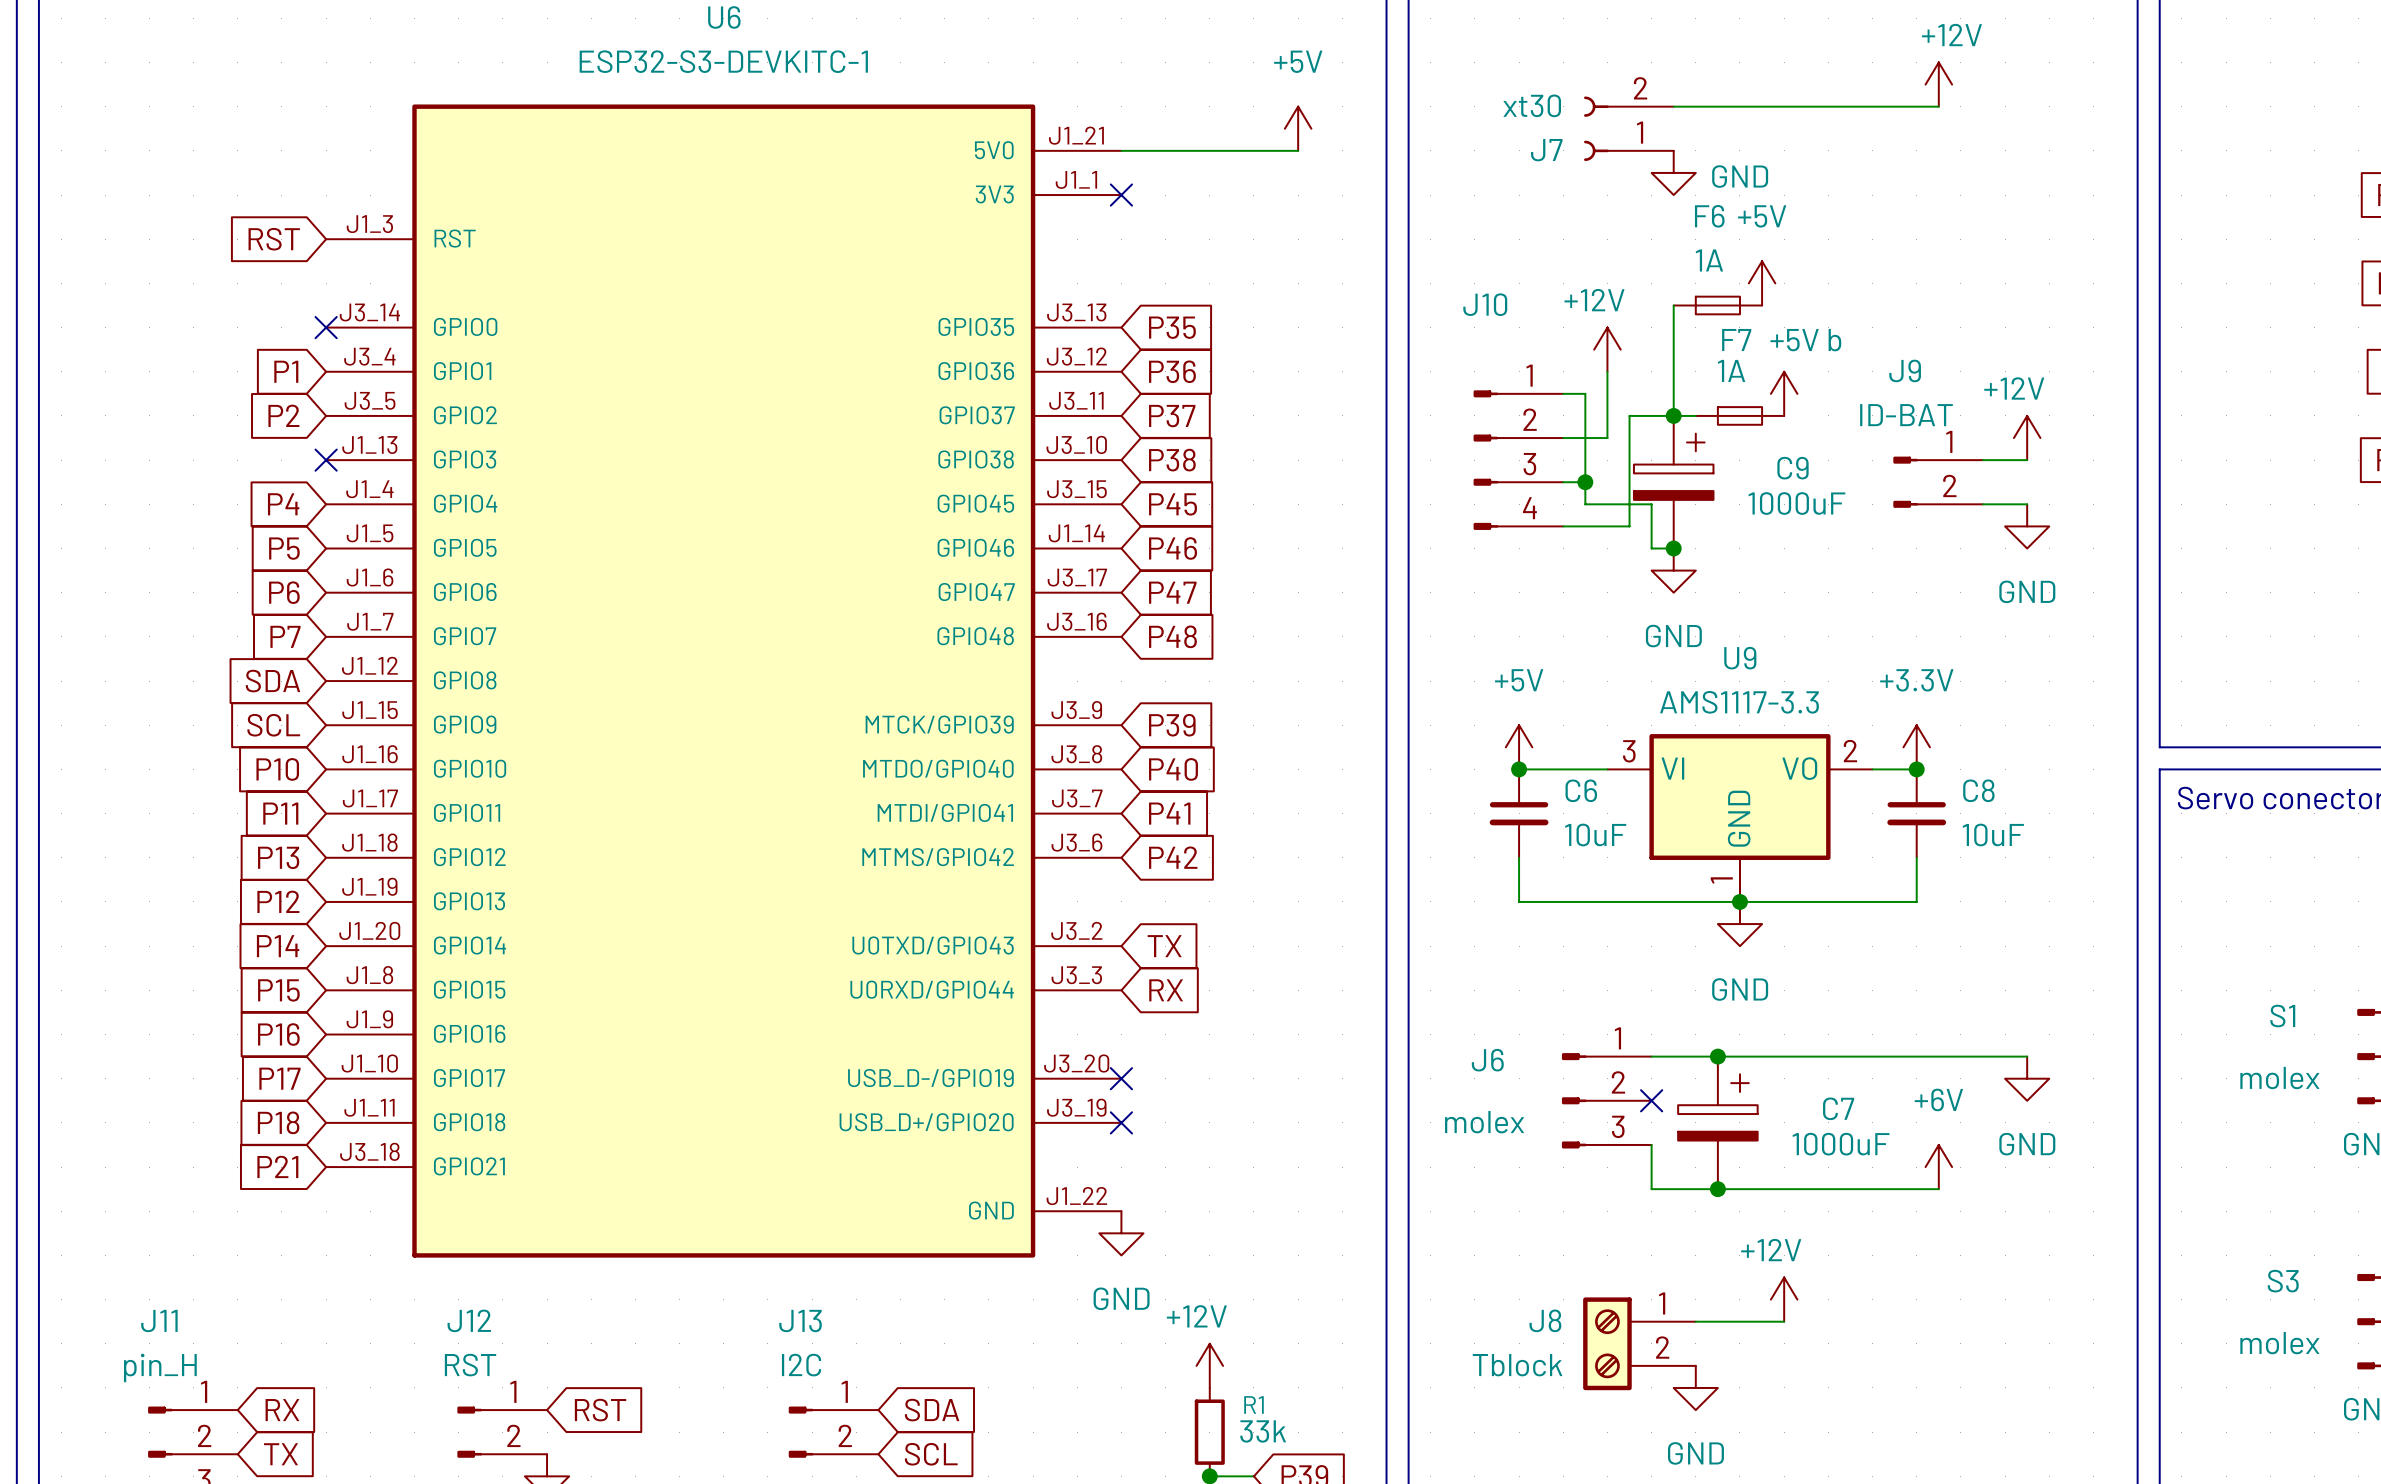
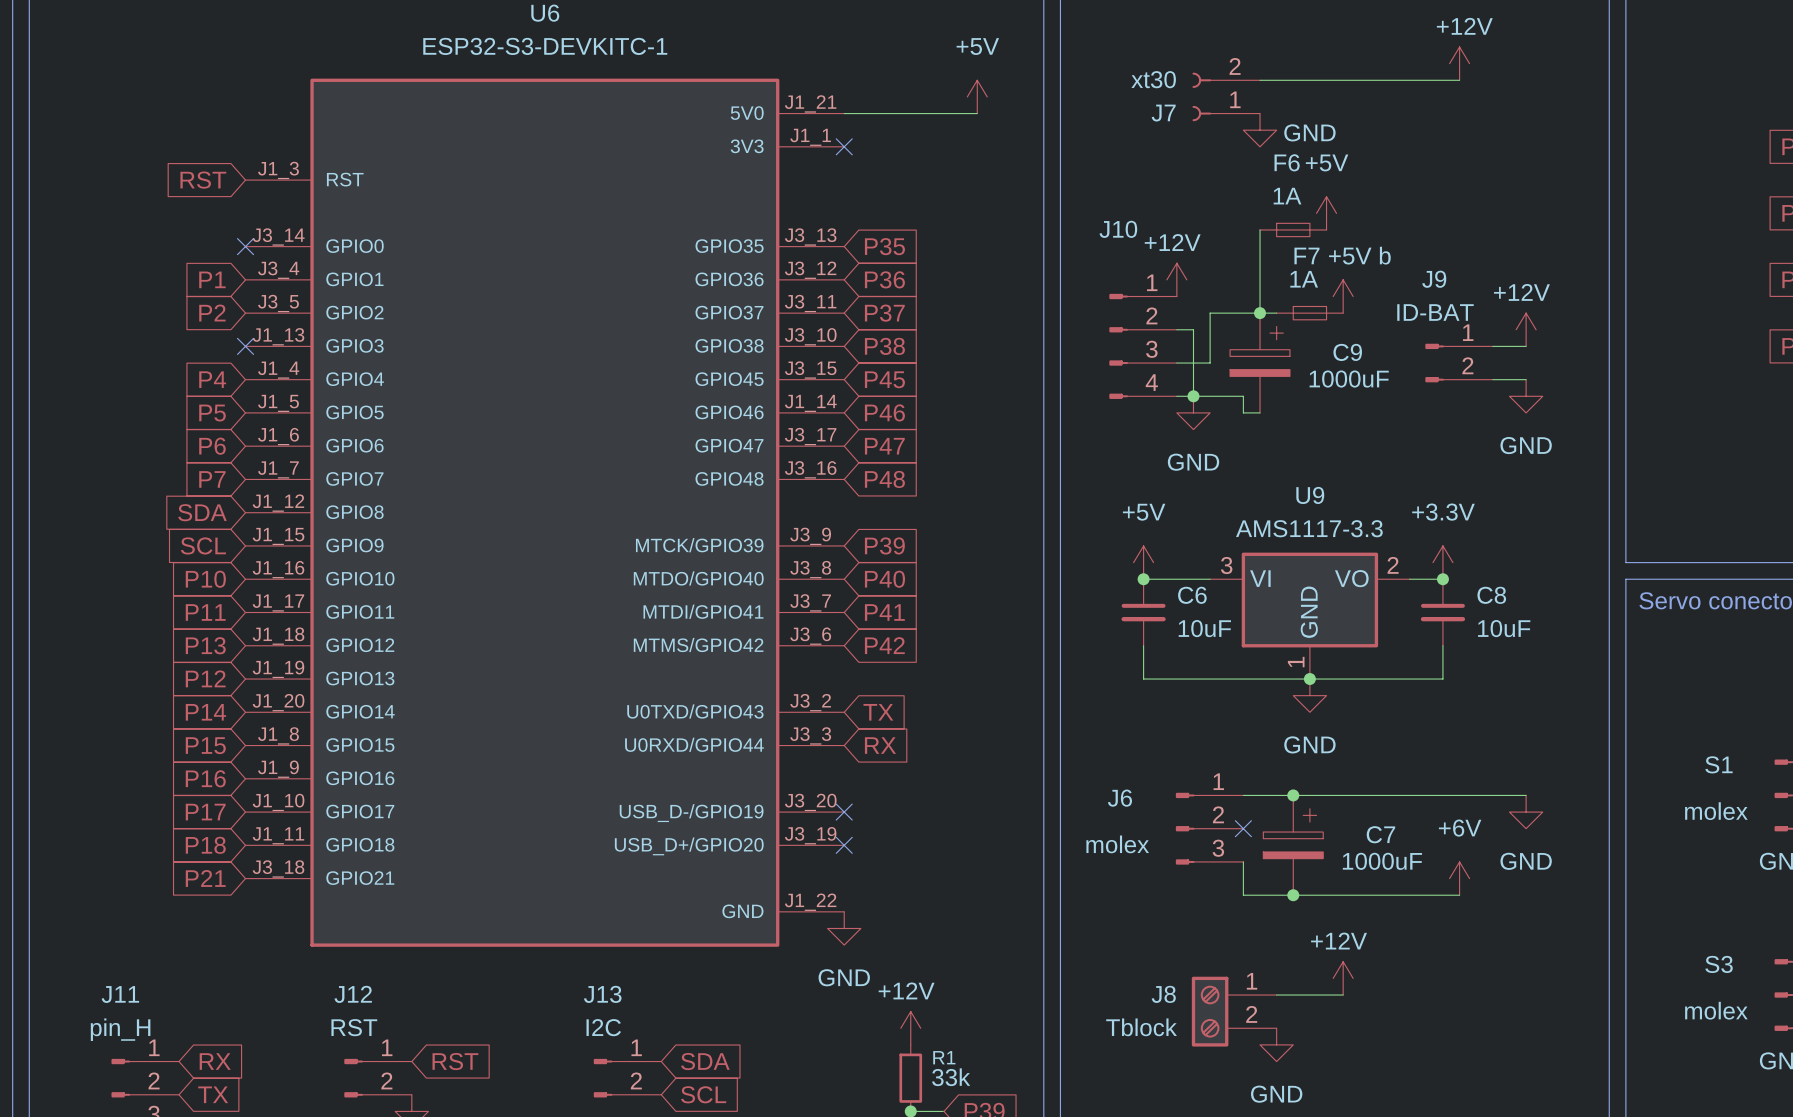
power symbol position: +12V (1607, 349) -> +12V (1176, 279)
wire: (1607, 371) (1607, 415) -> (1226, 313) (1210, 313)
wire: (1563, 393) (1585, 393) (1585, 438) (1607, 438) -> (1193, 363) (1210, 363) (1210, 329)
wire: (1629, 415) (1629, 526) -> none
junction position: (1585, 482) -> (1193, 396)
wire: (1585, 504) (1651, 504) (1651, 526) -> (1226, 396) (1243, 396)
wire: none -> (1193, 379) (1193, 396)
junction: (1673, 548) -> none
power symbol position: GND (1673, 570) -> GND (1193, 412)

